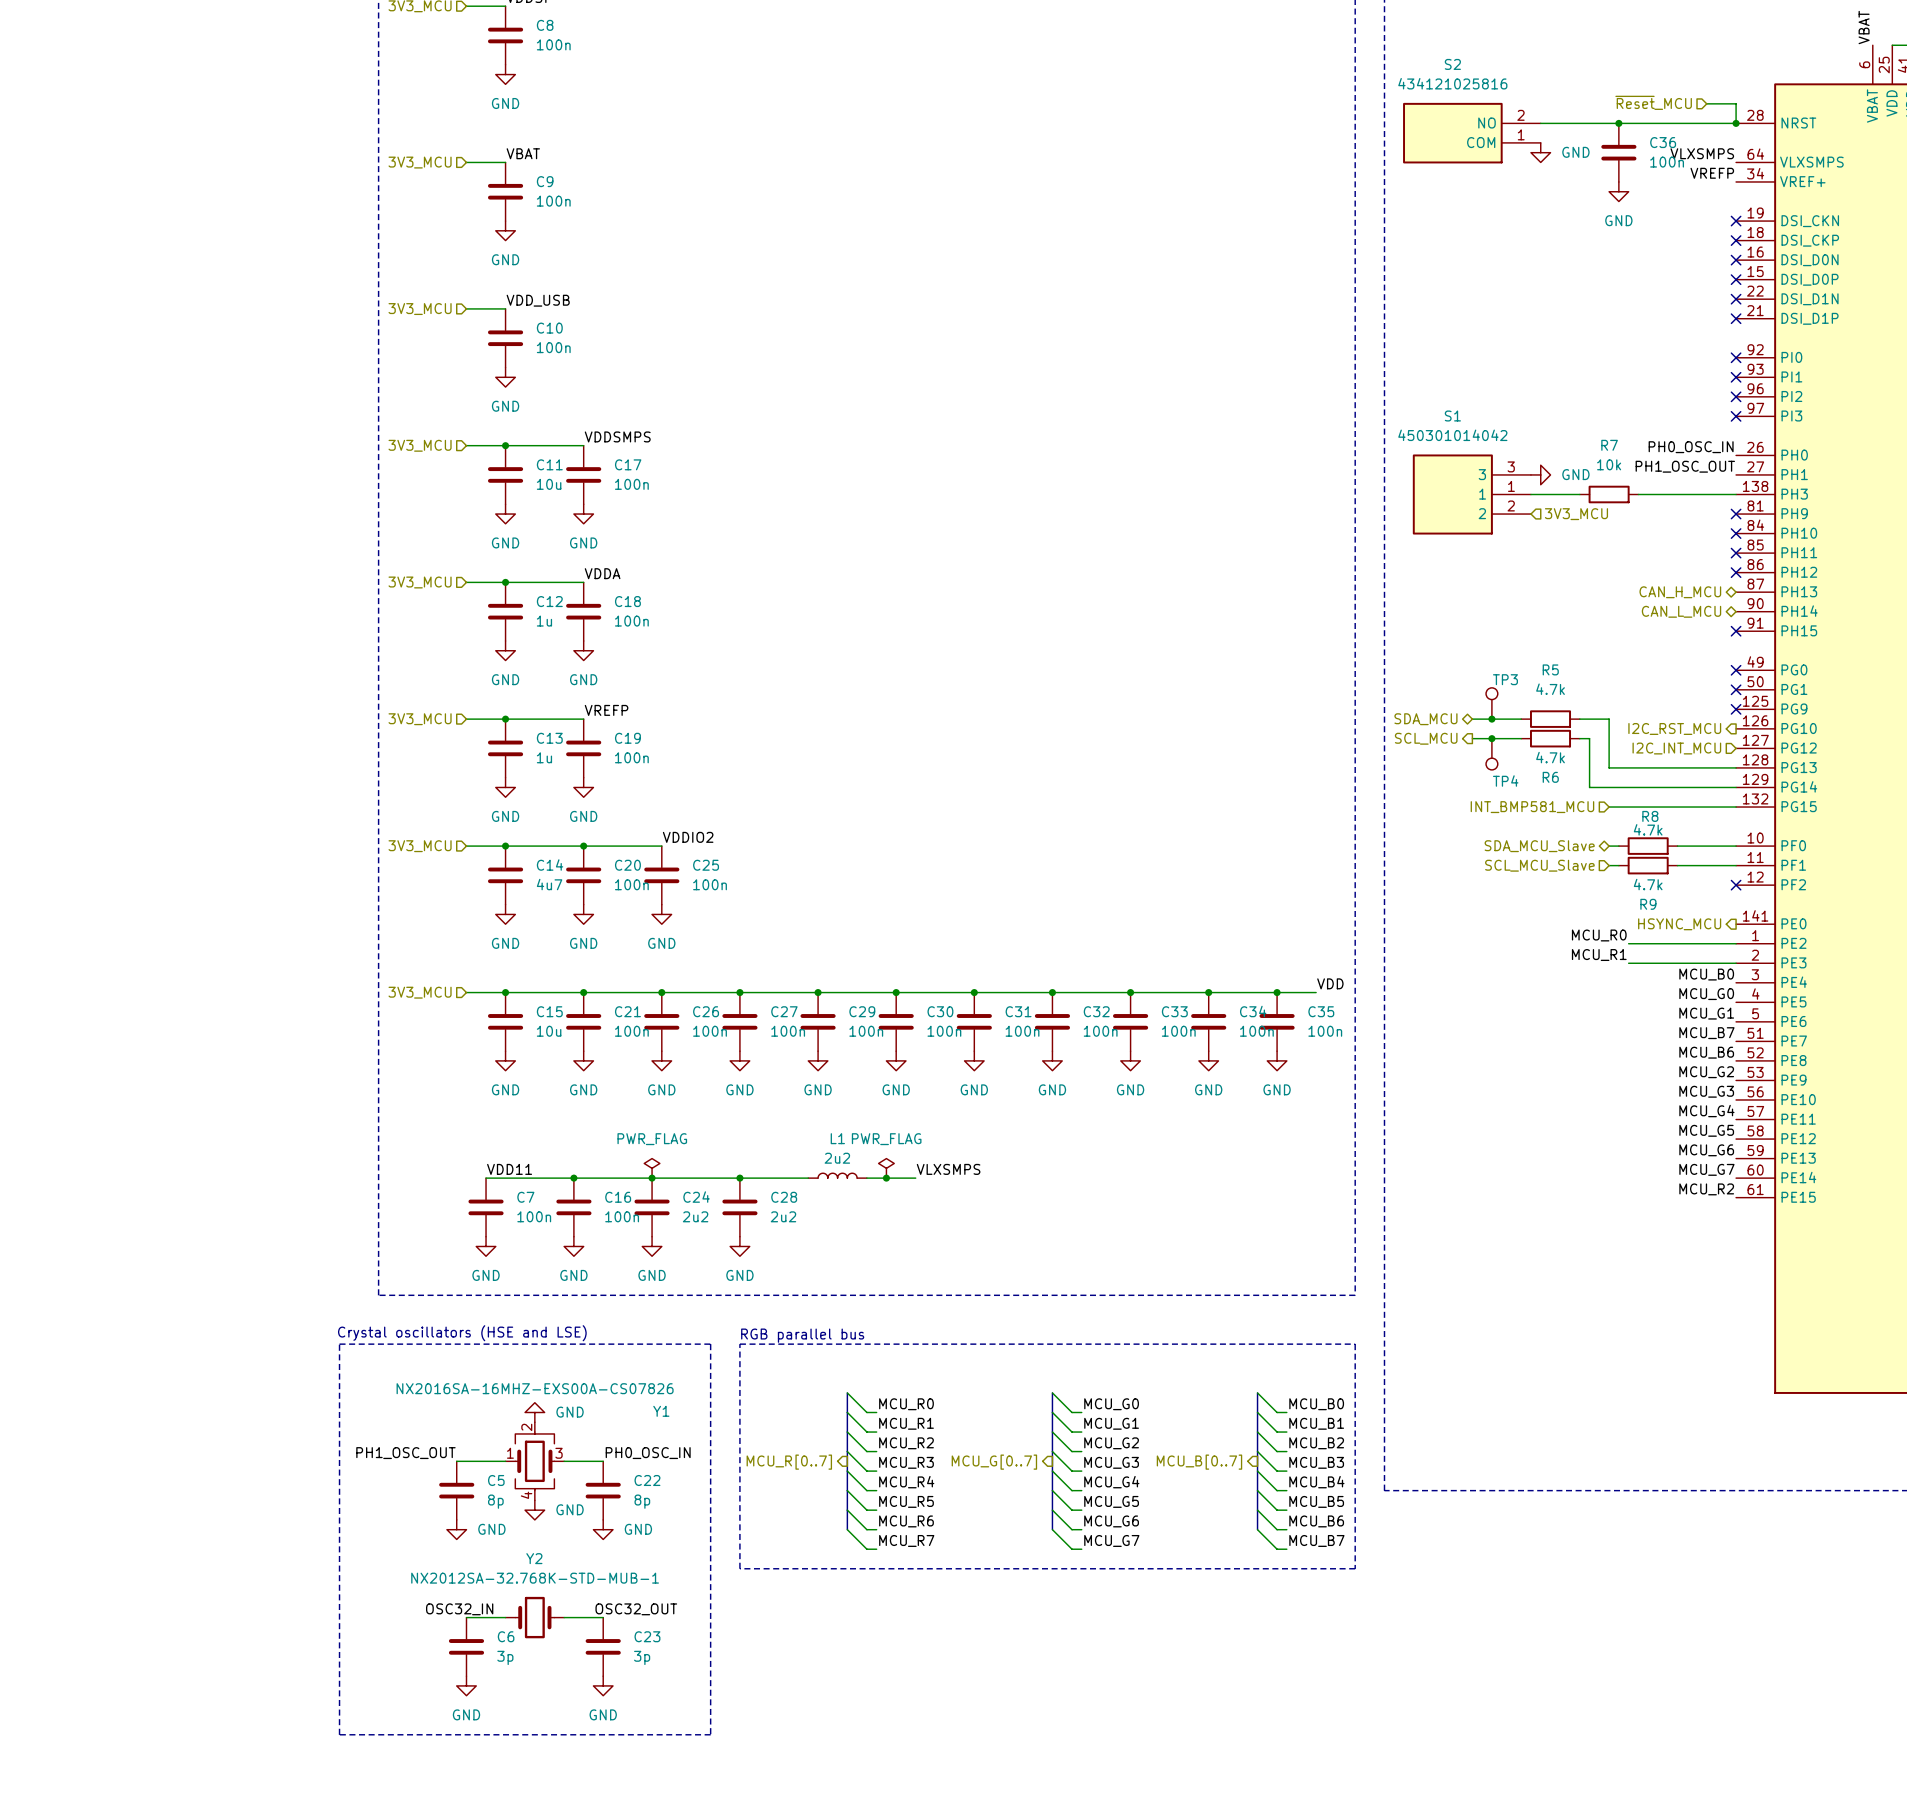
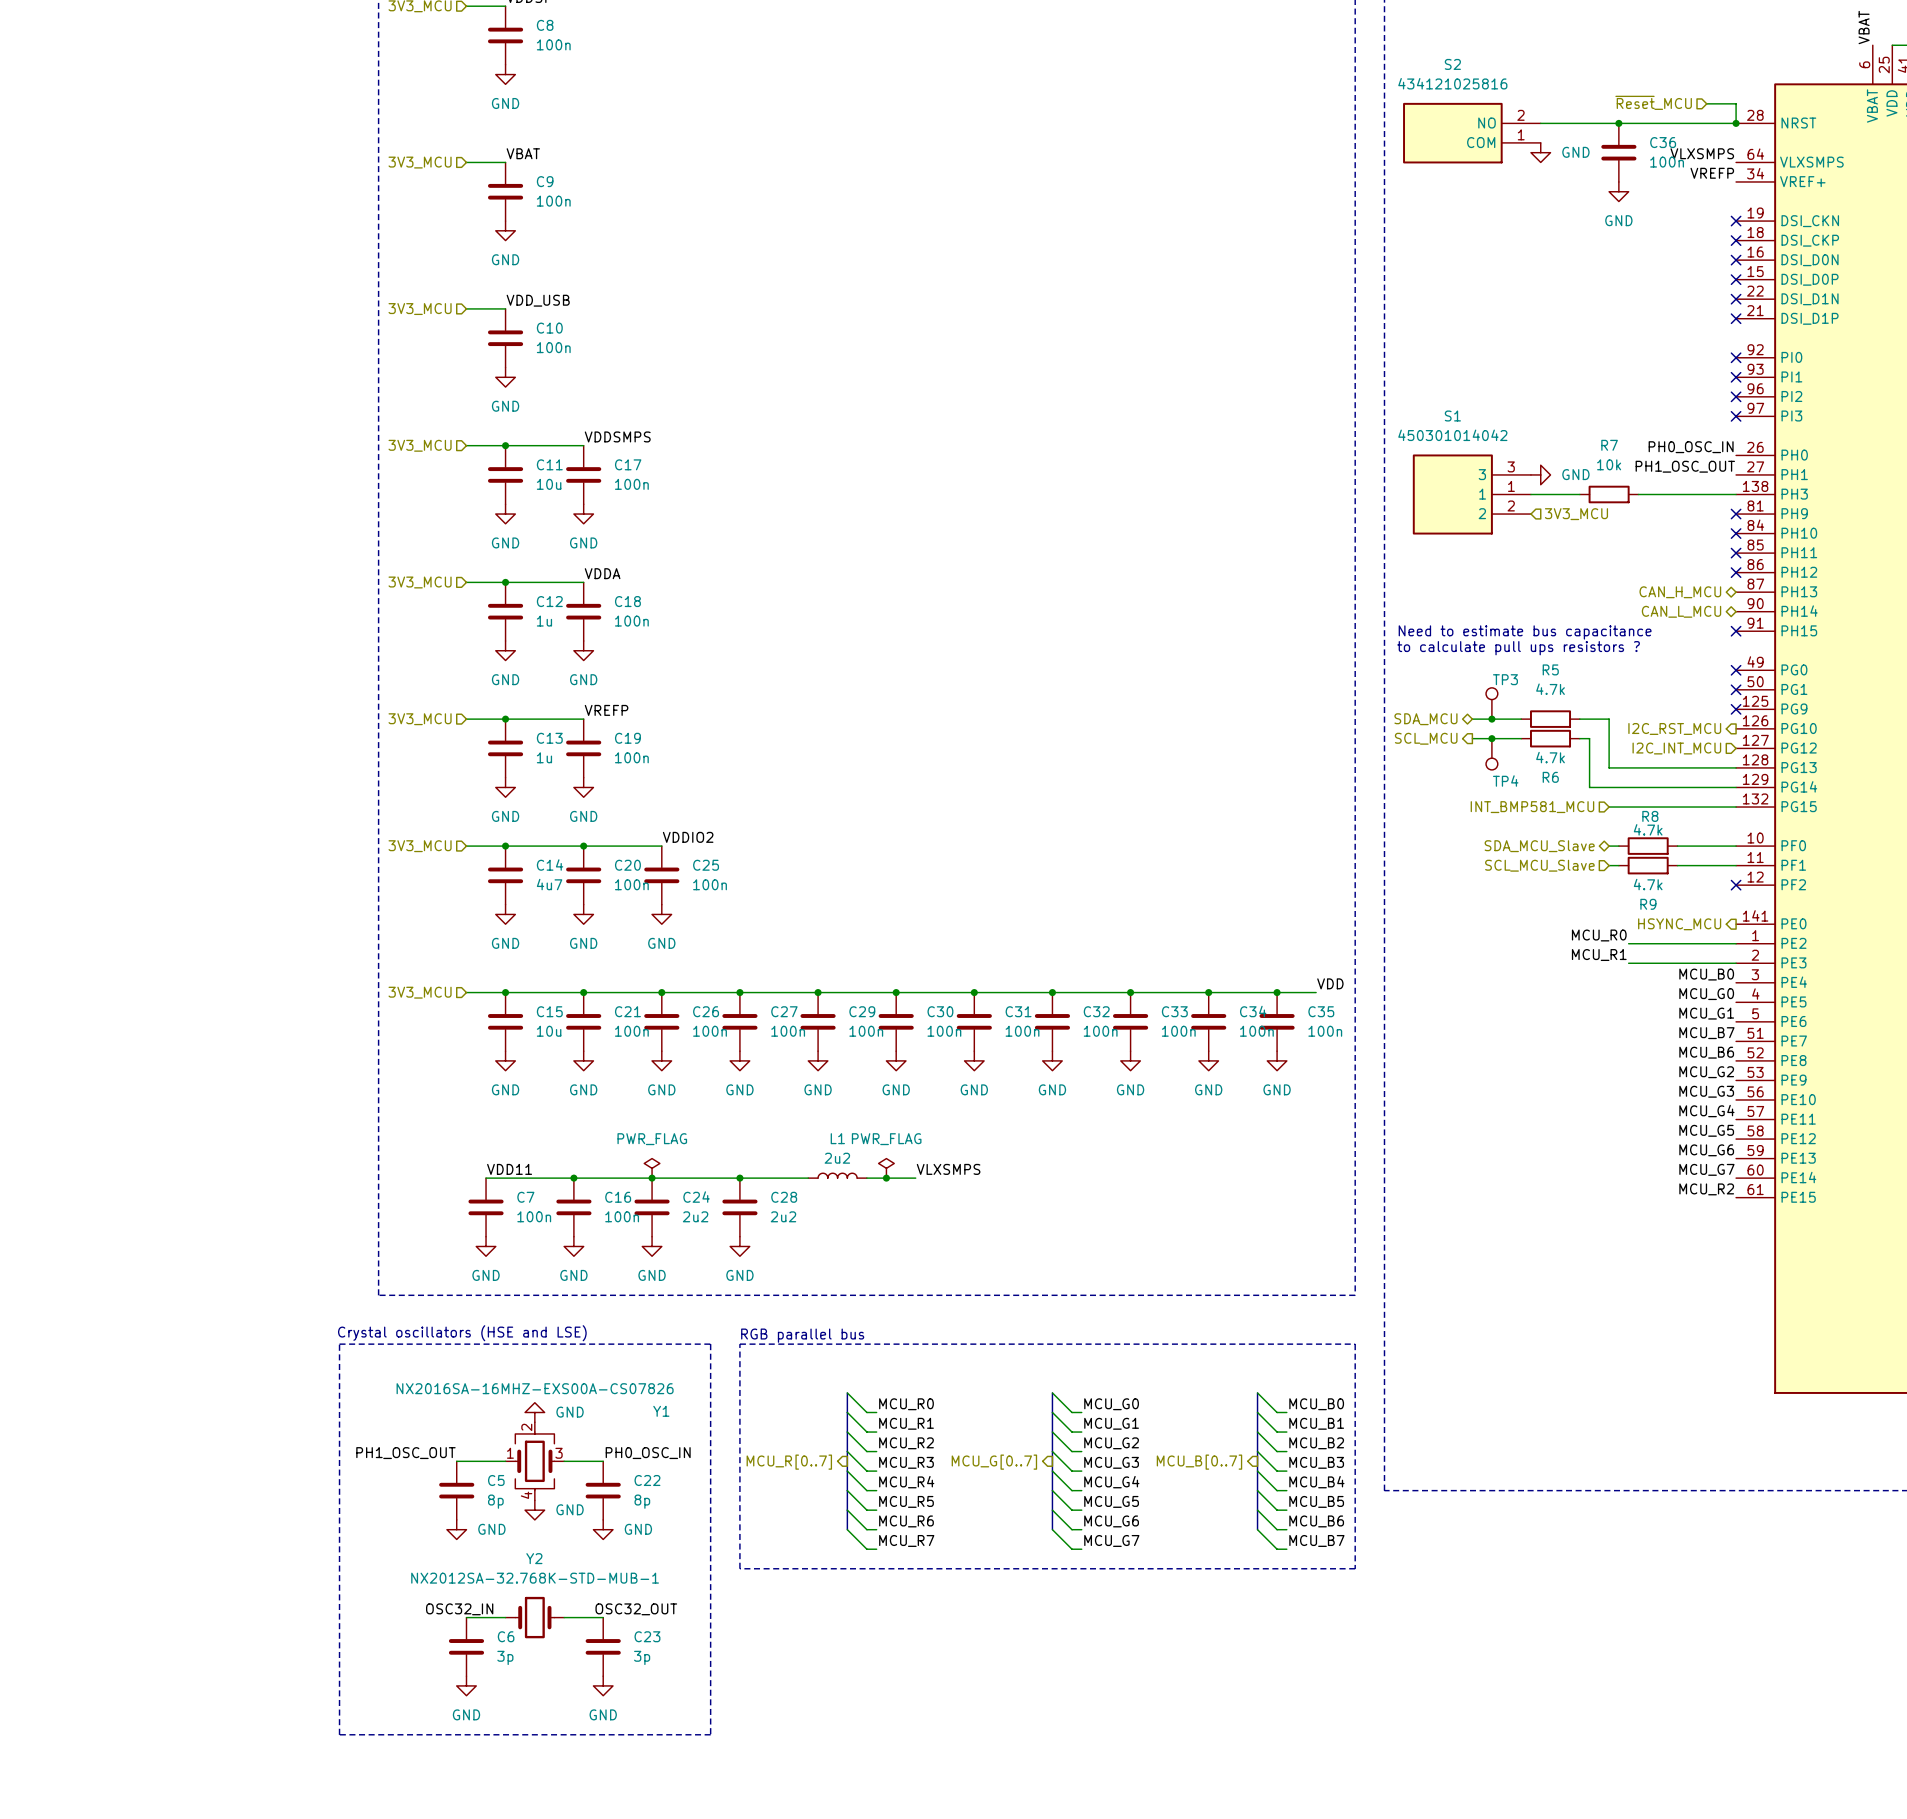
text: none -> Need to estimate bus capacitance (1525, 632)
text: none -> to calculate pull ups resistors ? (1518, 648)

